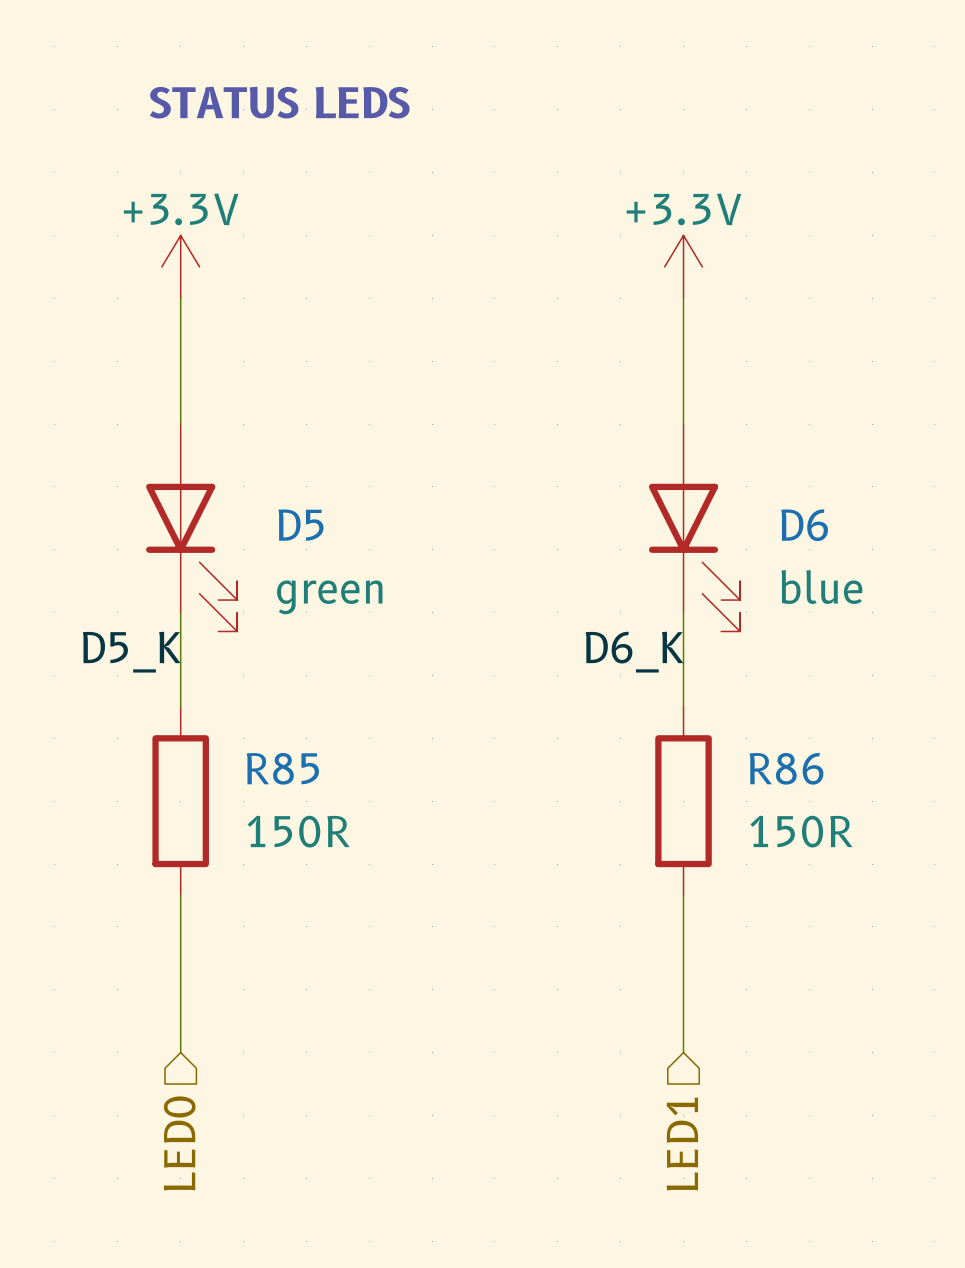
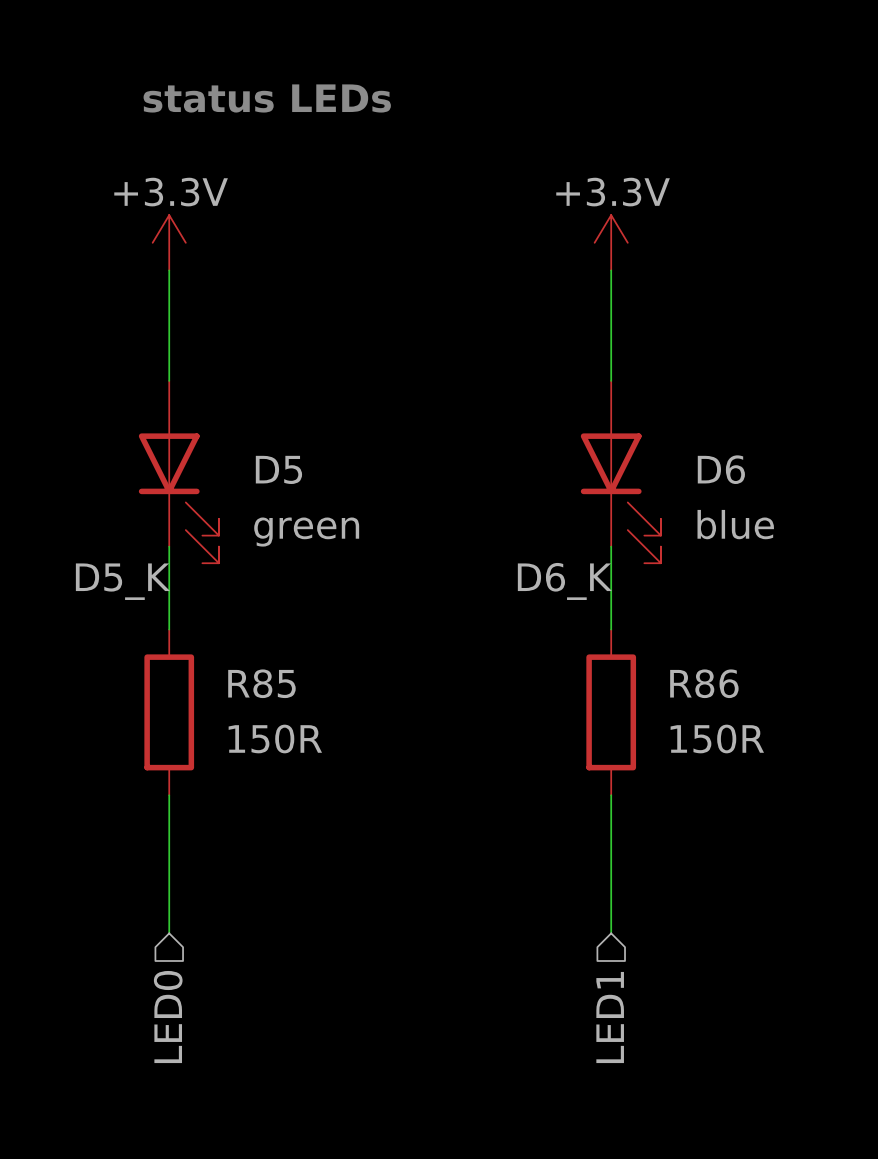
text: STATUS LEDS (279, 102) -> status LEDs (267, 98)

